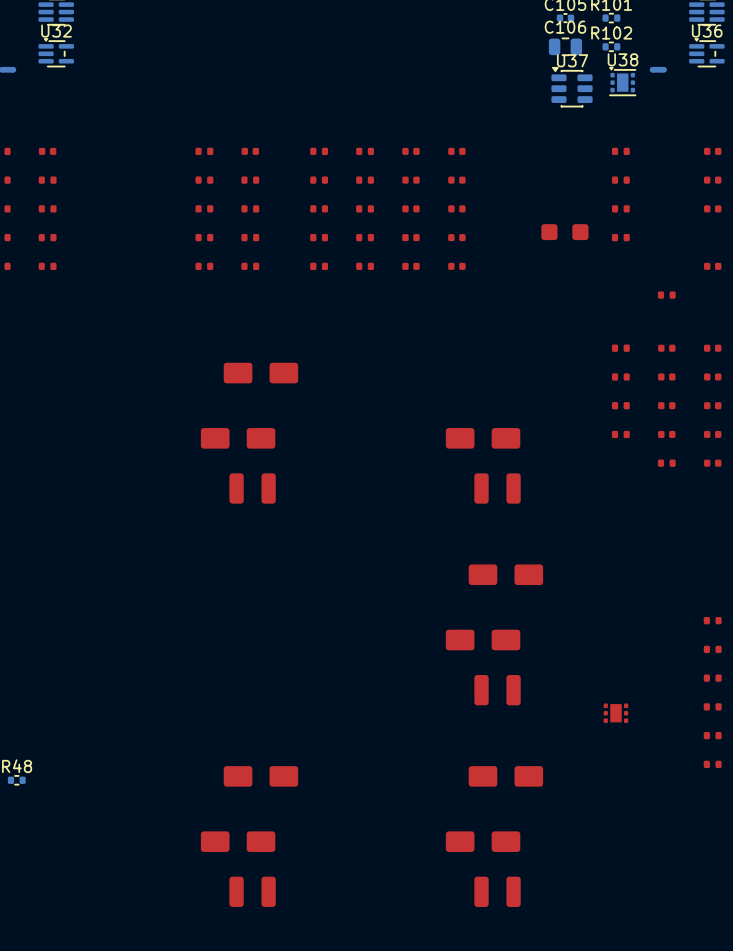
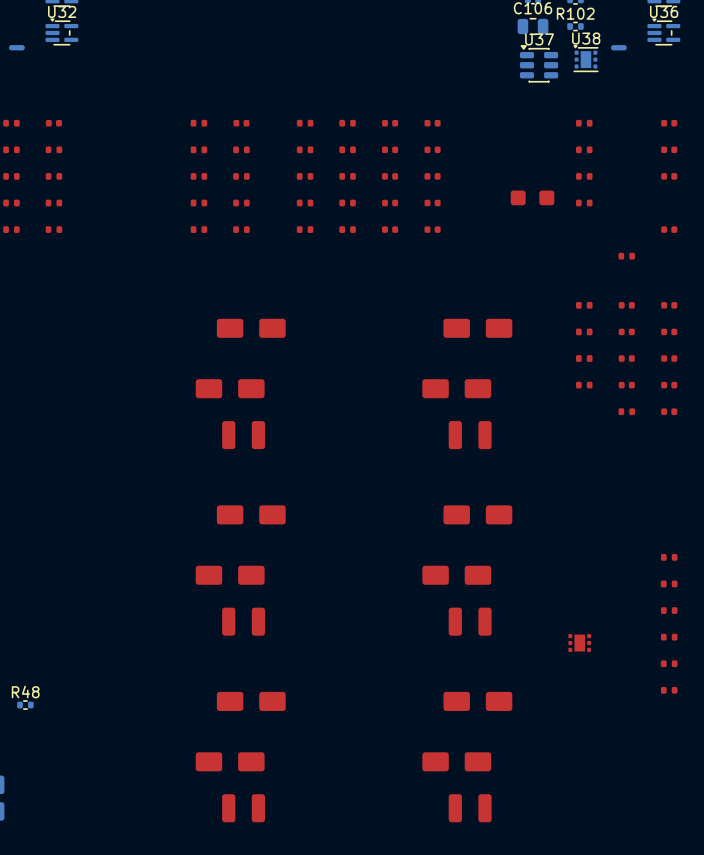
part: none -> (477, 328)
part: none -> (251, 514)
part: none -> (230, 575)
part: none -> (243, 621)

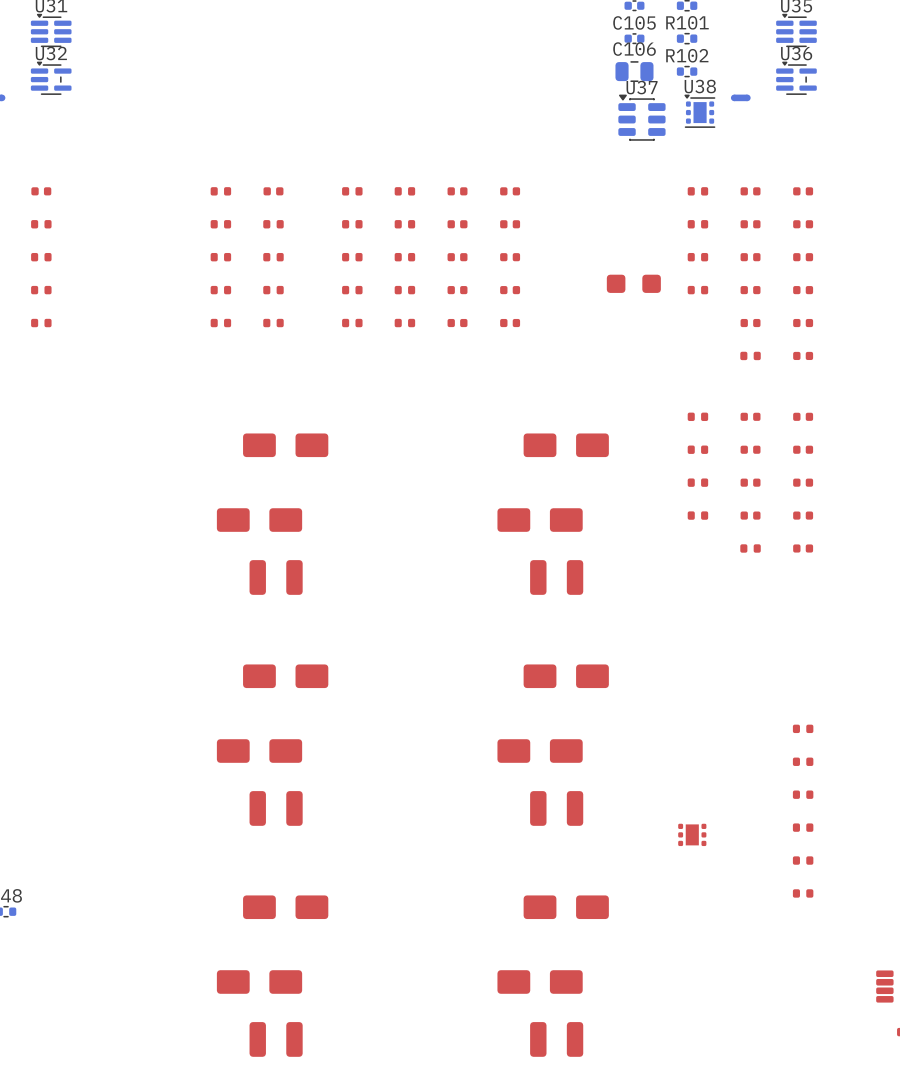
part: none -> (750, 191)
part: none -> (750, 224)
part: none -> (750, 257)
part: none -> (750, 290)
part: none -> (803, 290)
part: none -> (750, 323)
part: none -> (803, 355)

